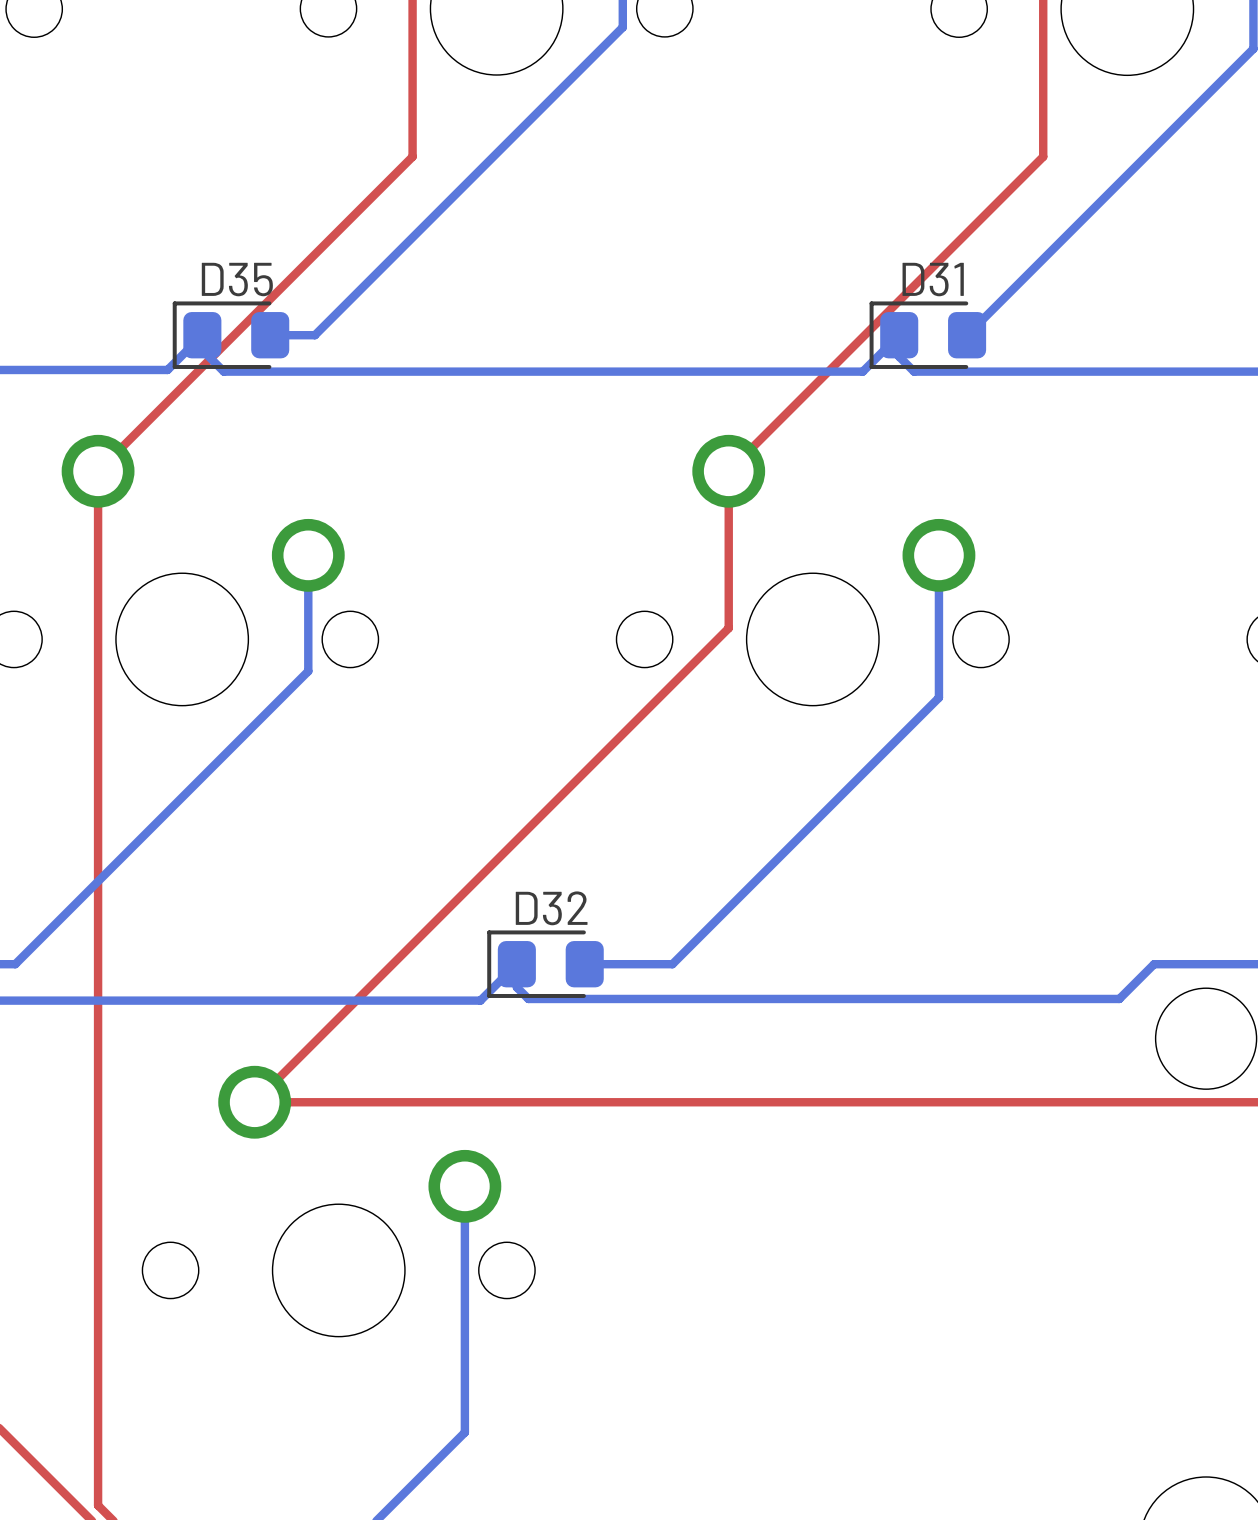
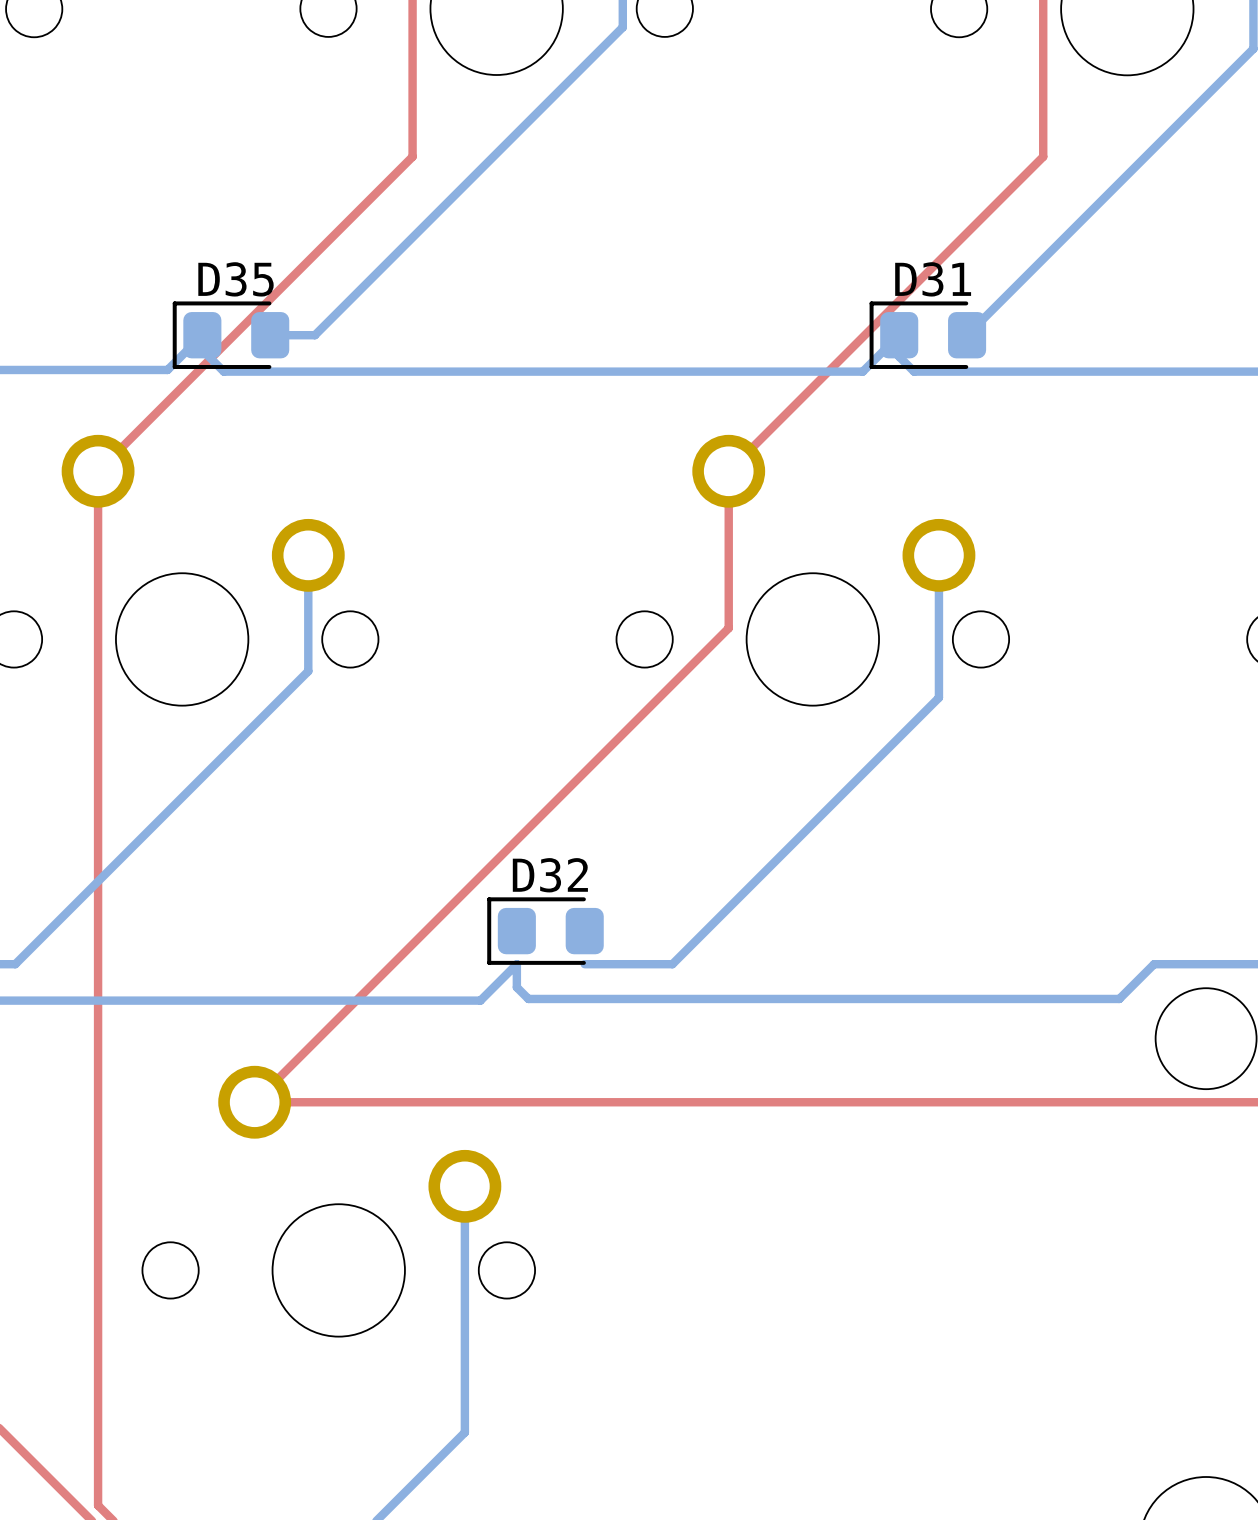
D32 position: (545, 964) -> (545, 931)

